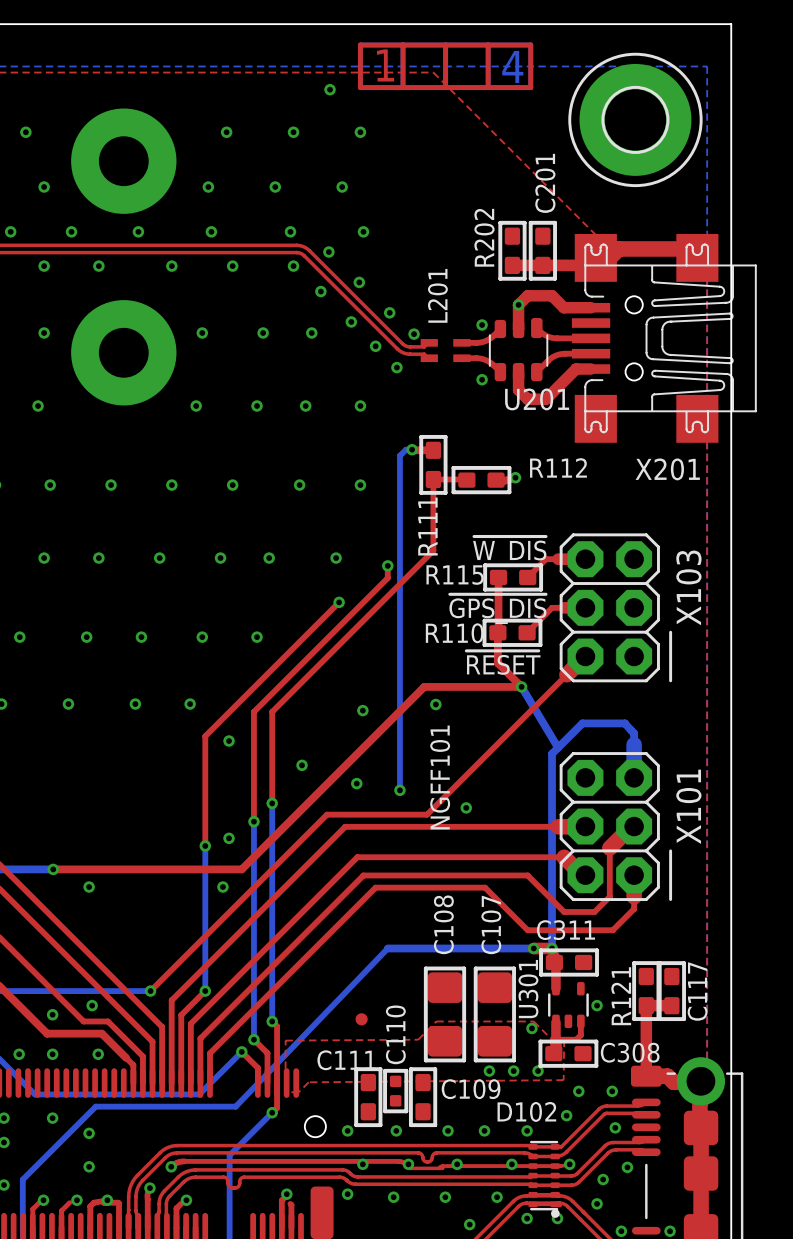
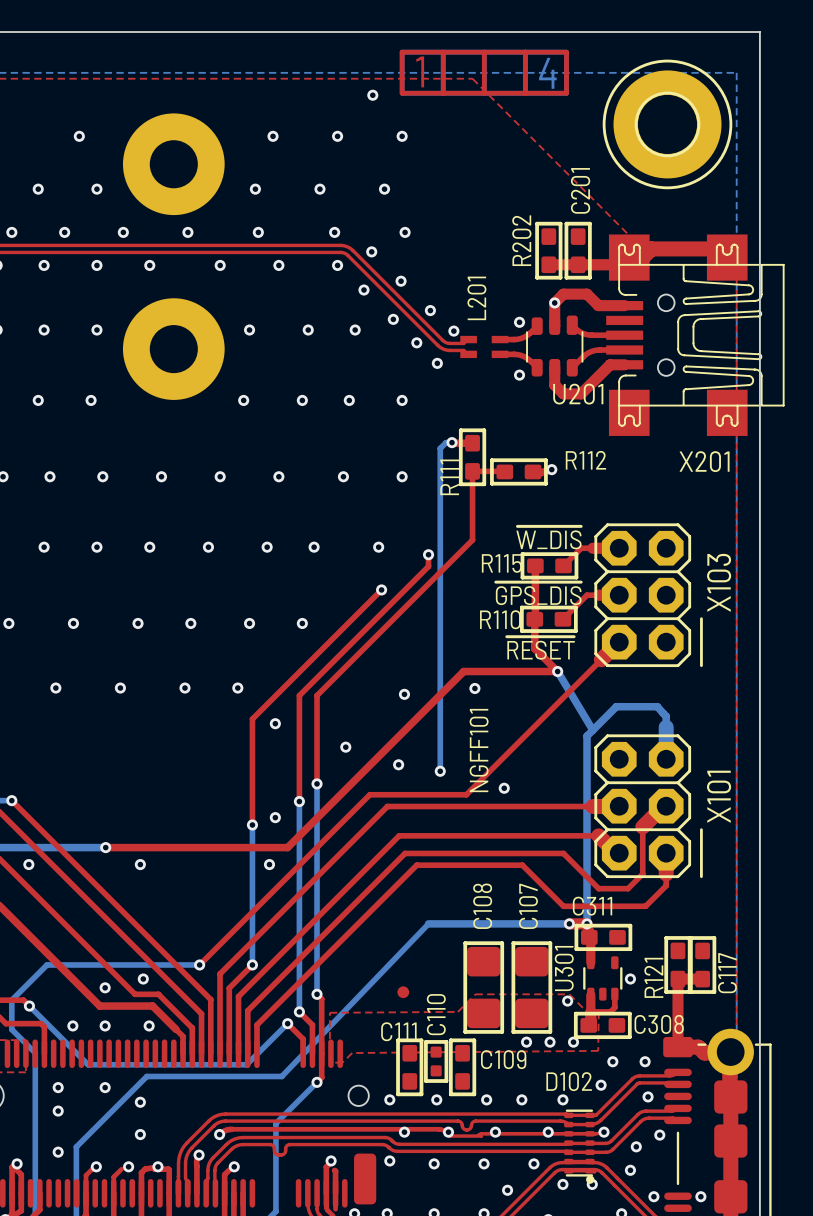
R111 name position: R111 (427, 526) -> R111 (449, 477)

